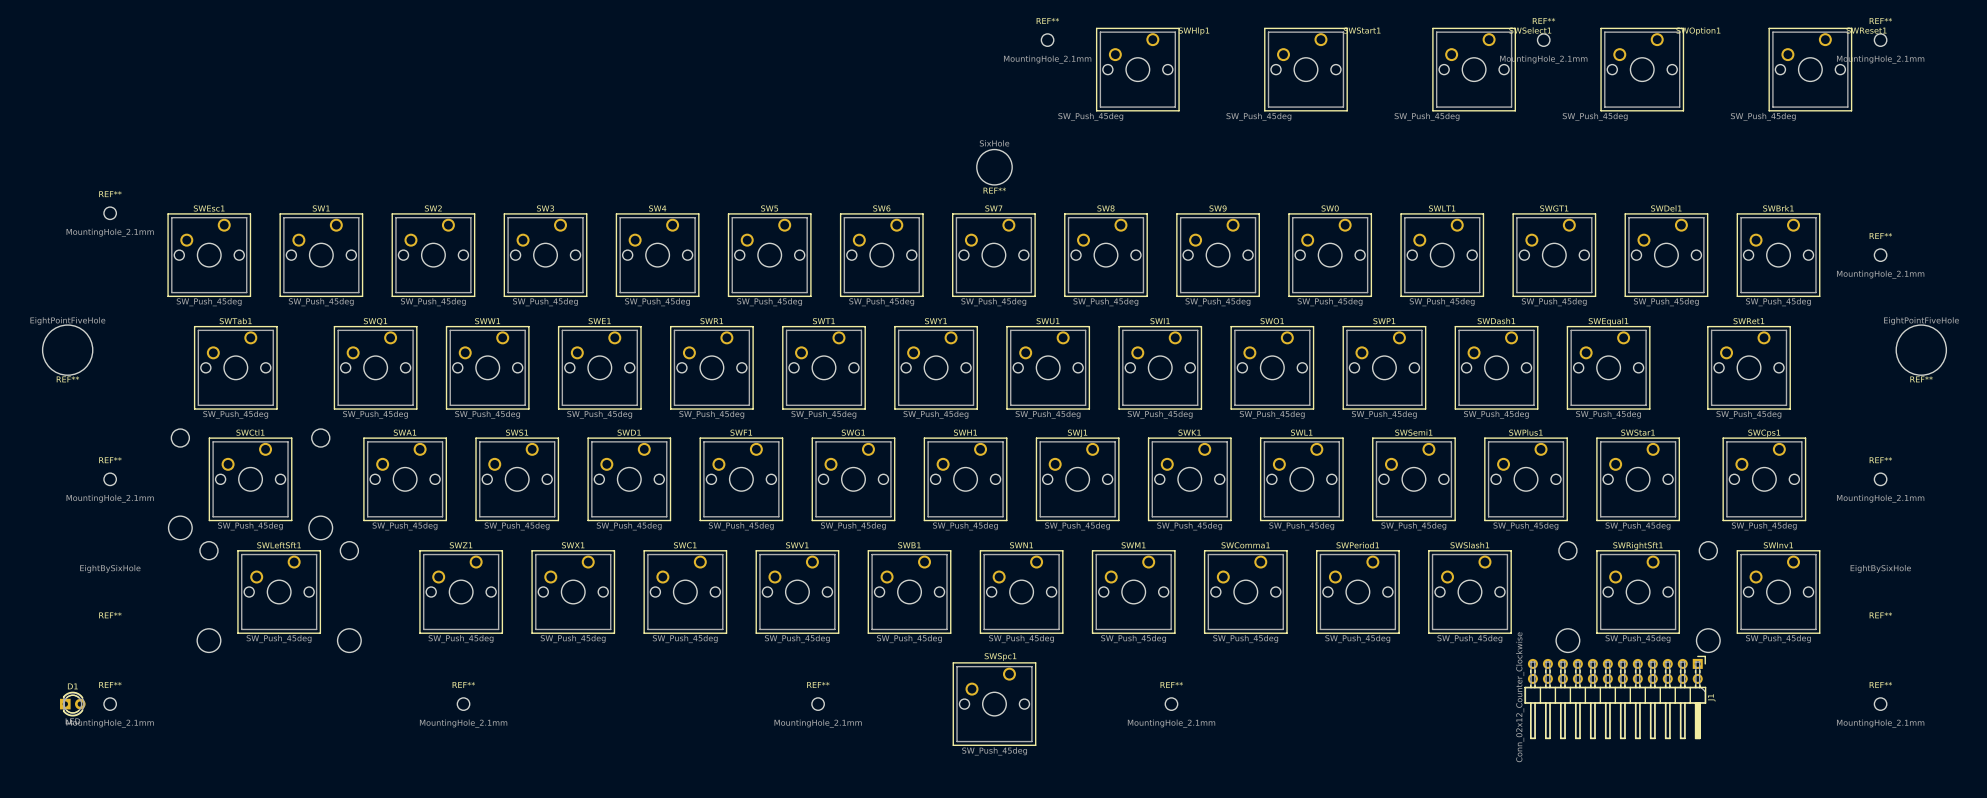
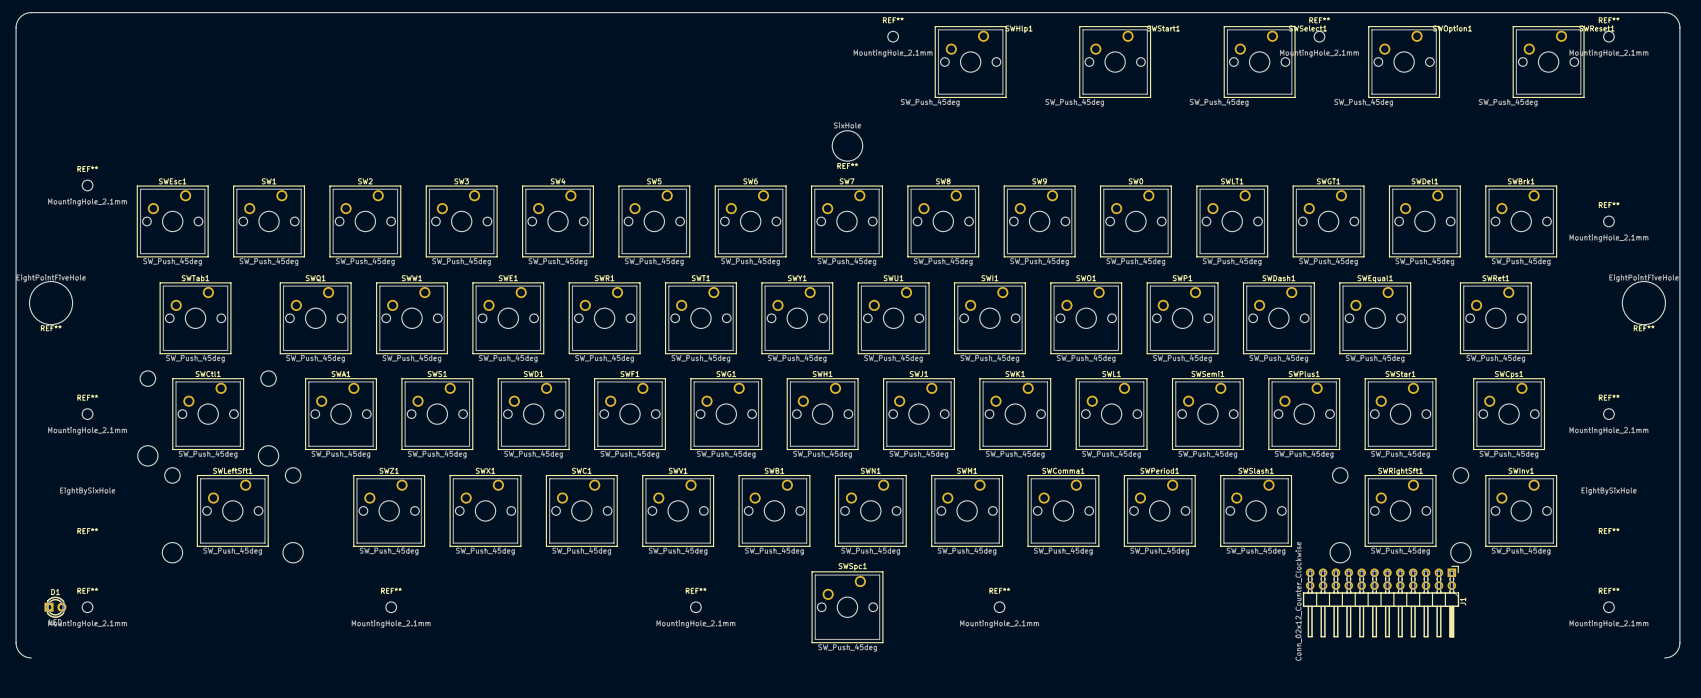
board edge: none -> (31, 657) (20, 653) (16, 642) (16, 27) (20, 17) (31, 12) (1670, 13) (1676, 18) (1679, 27) (1679, 642) (1675, 653) (1664, 657)

